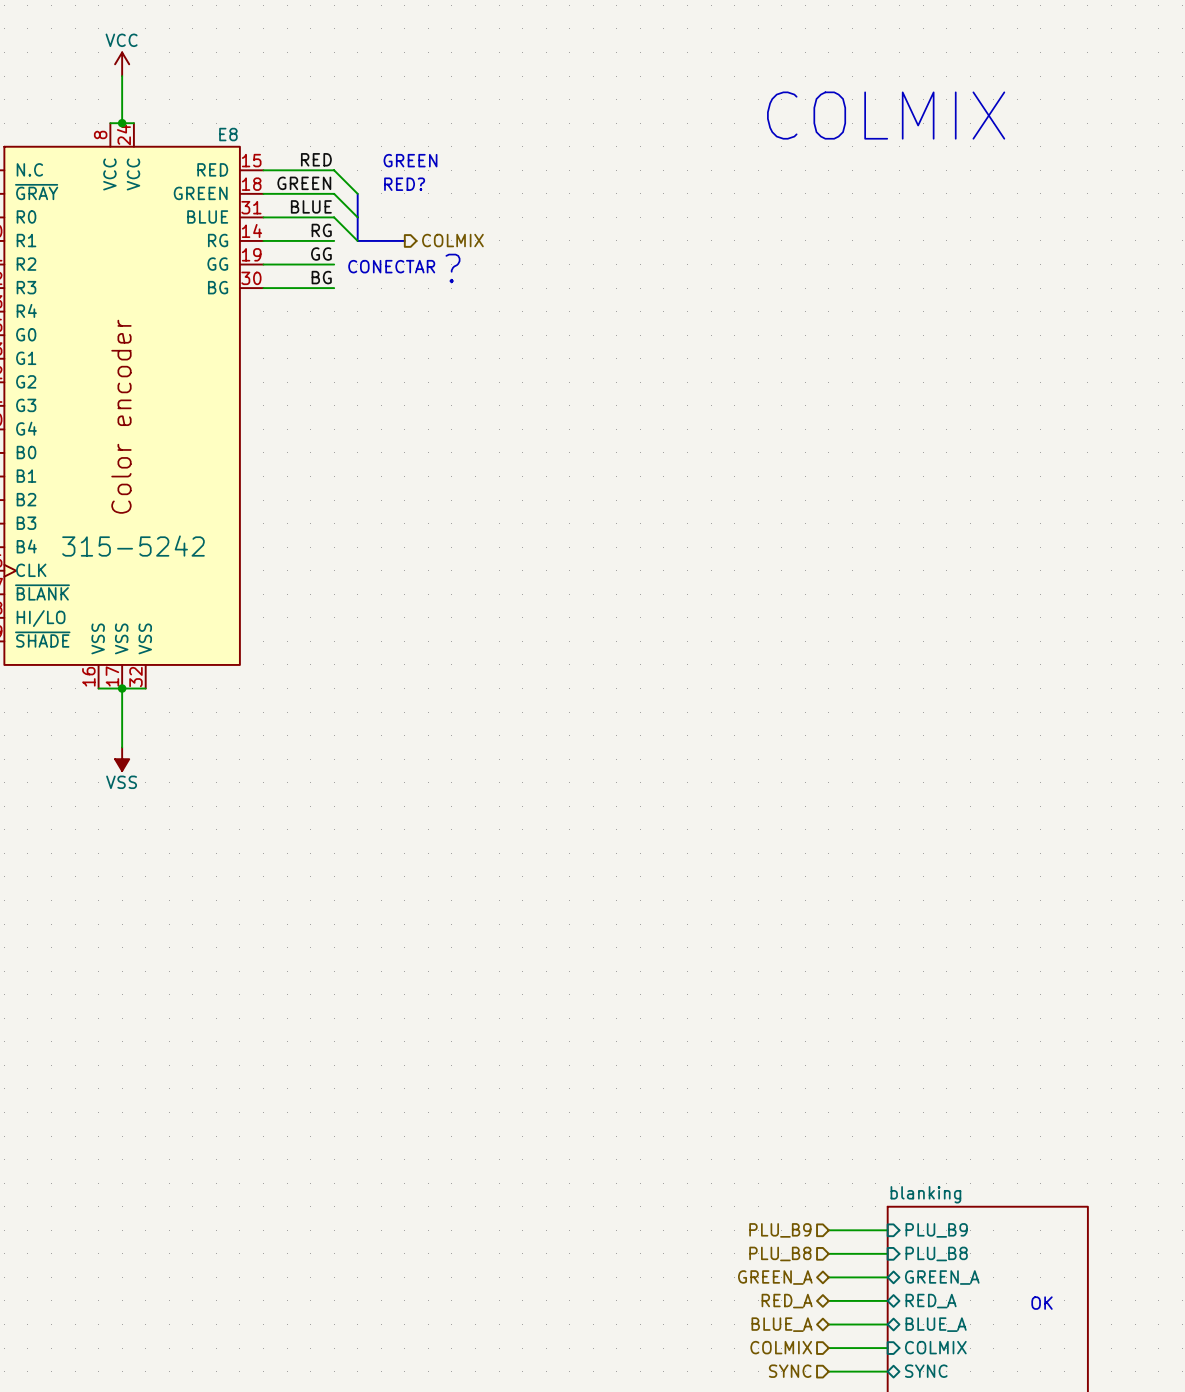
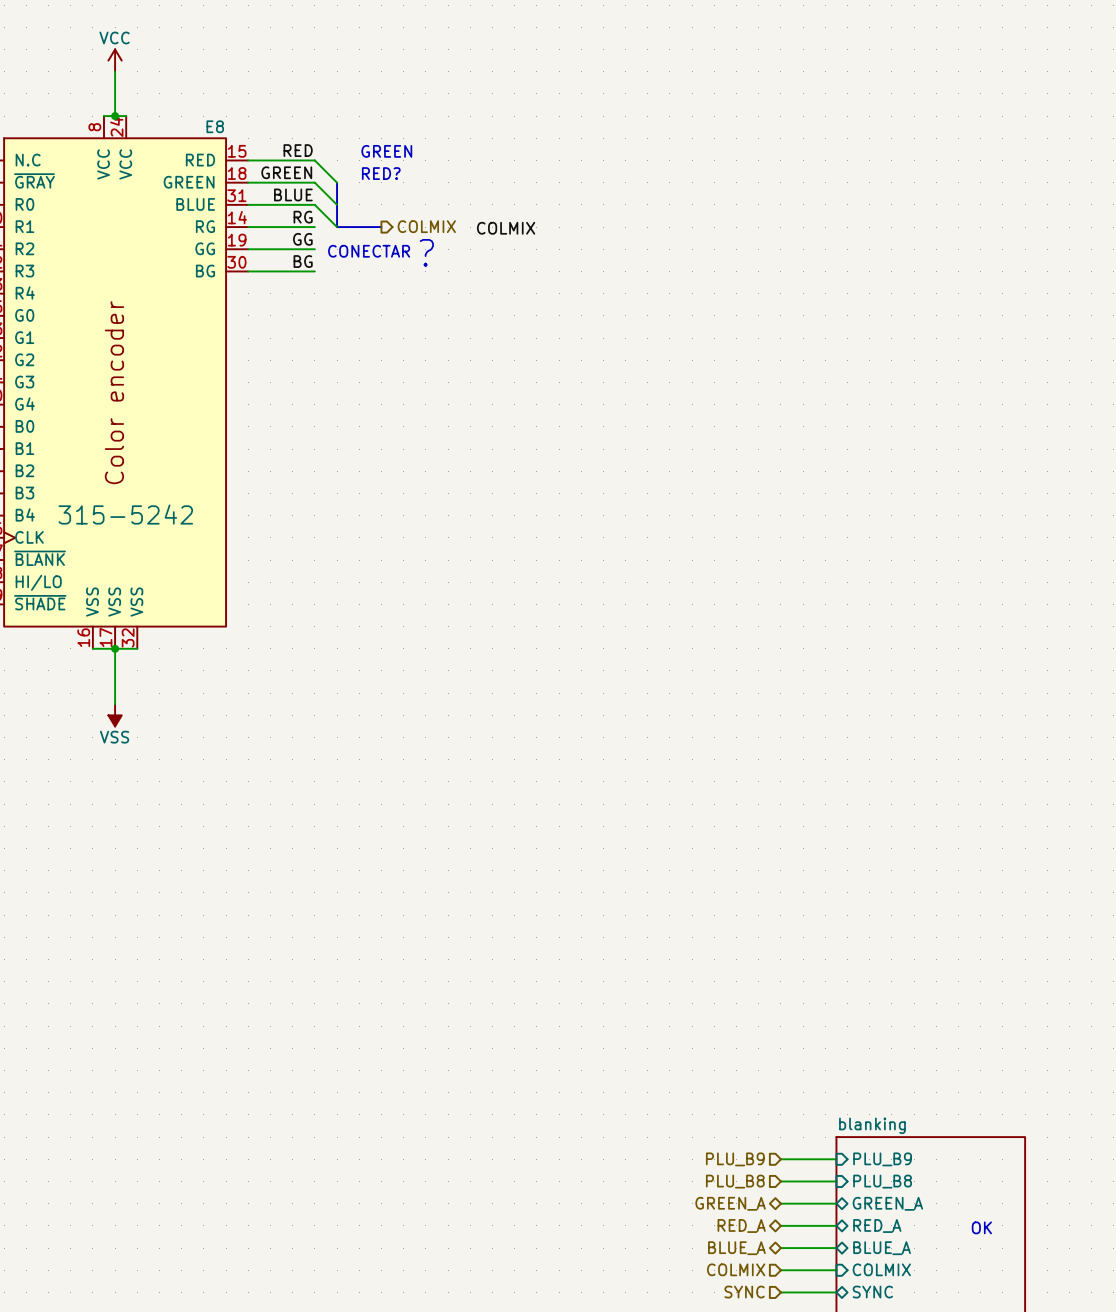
text: COLMIX (886, 115) -> none
label: none -> COLMIX (506, 228)

